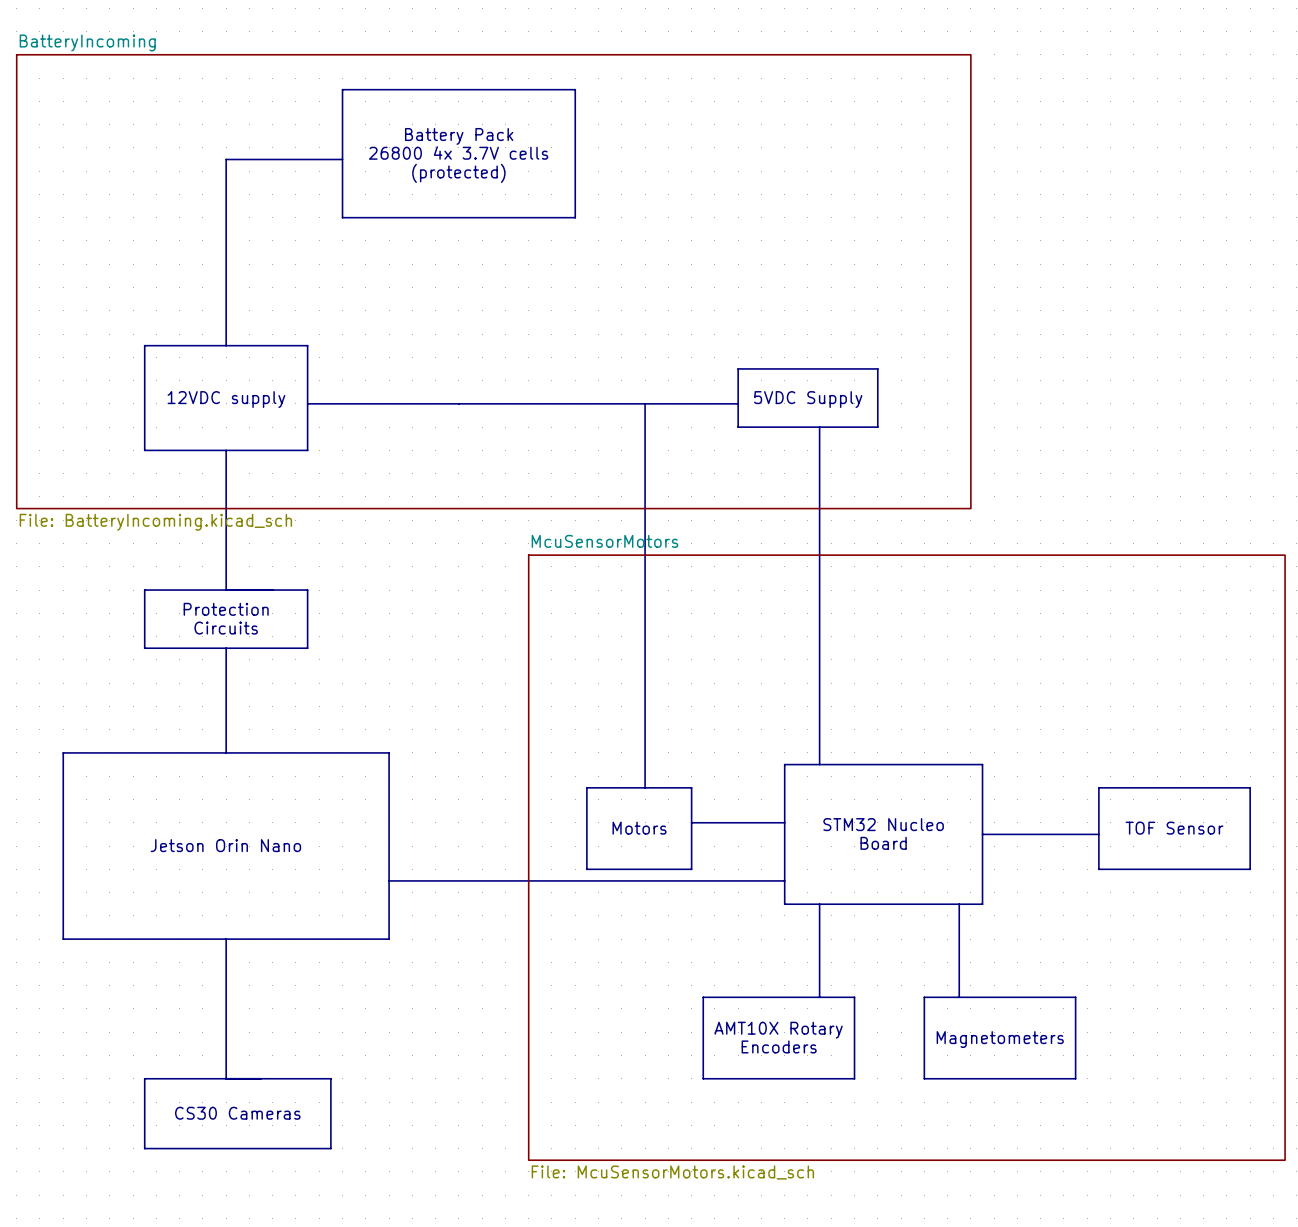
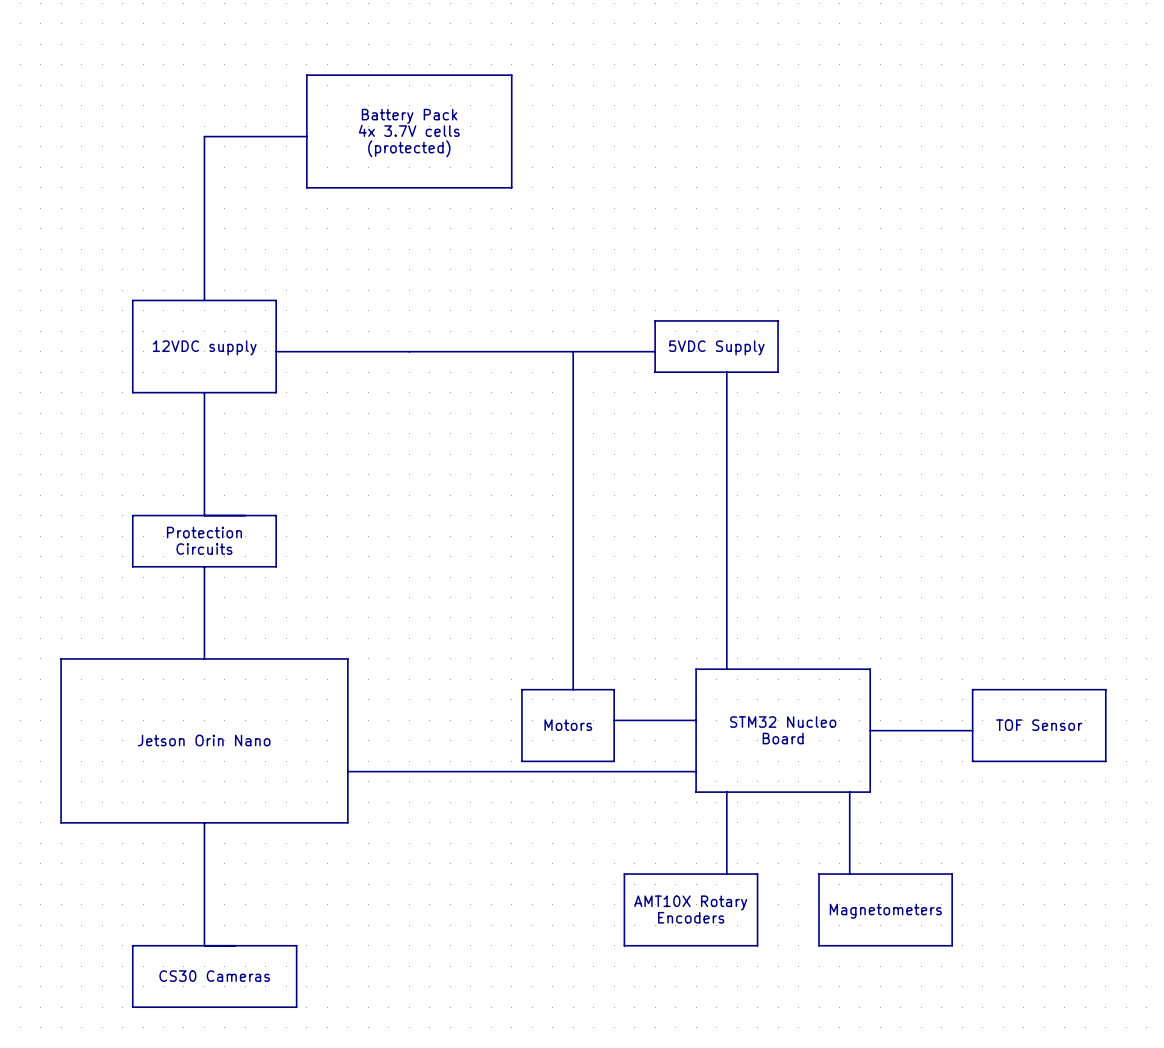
text: 26800 4x 3.7V cells (458, 152) -> 4x 3.7V cells (409, 130)
sheet BatteryIncoming: File: BatteryIncoming.kicad_sch (493, 281) -> none
sheet McuSensorMotors: File: McuSensorMotors.kicad_sch (906, 857) -> none

